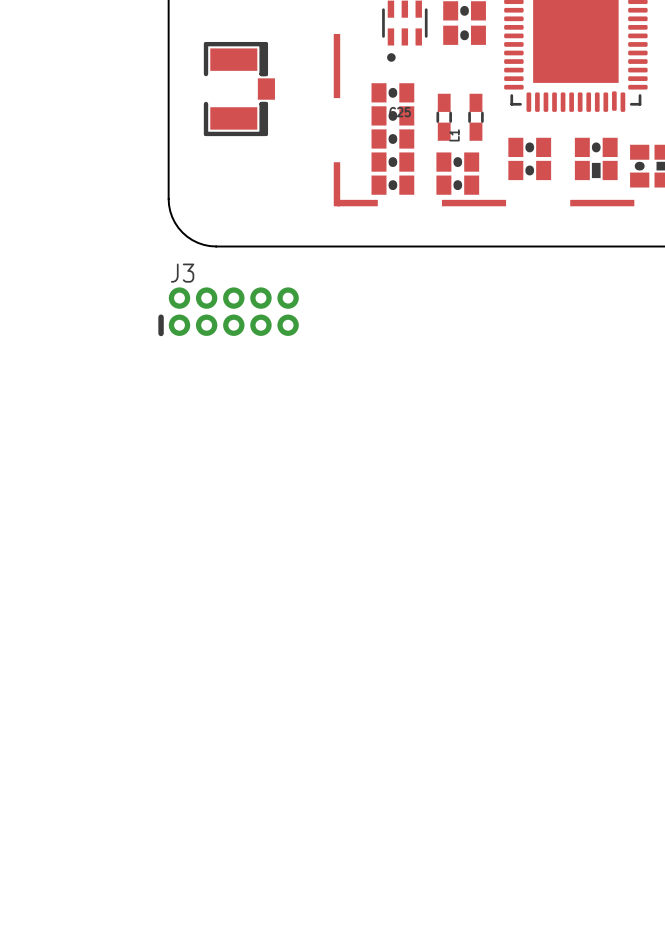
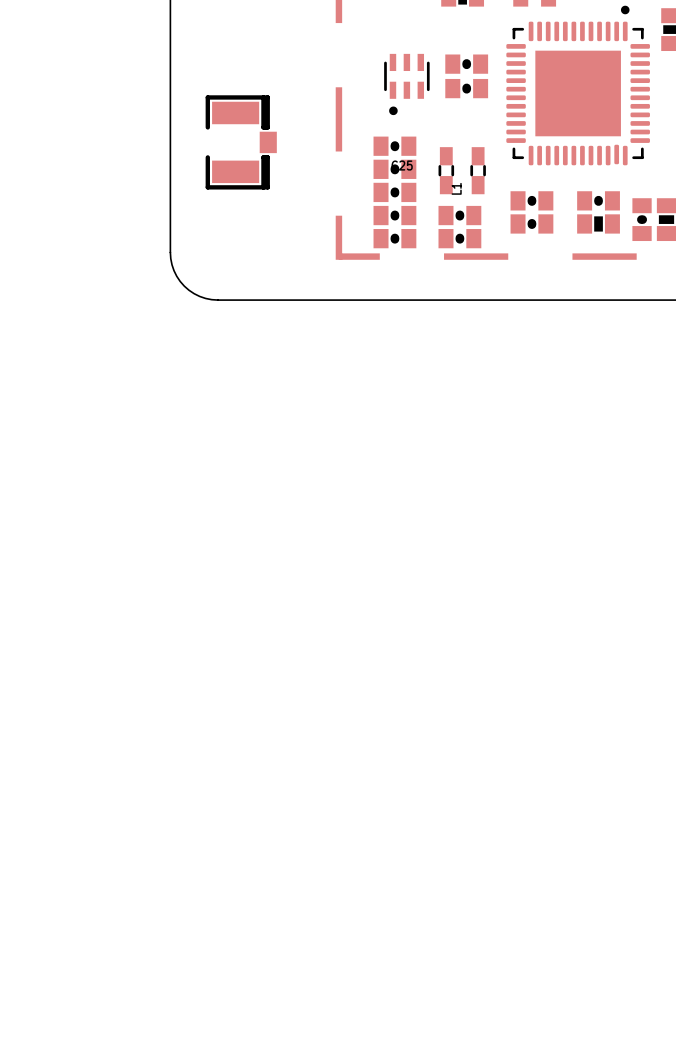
J3: (228, 311) -> none

